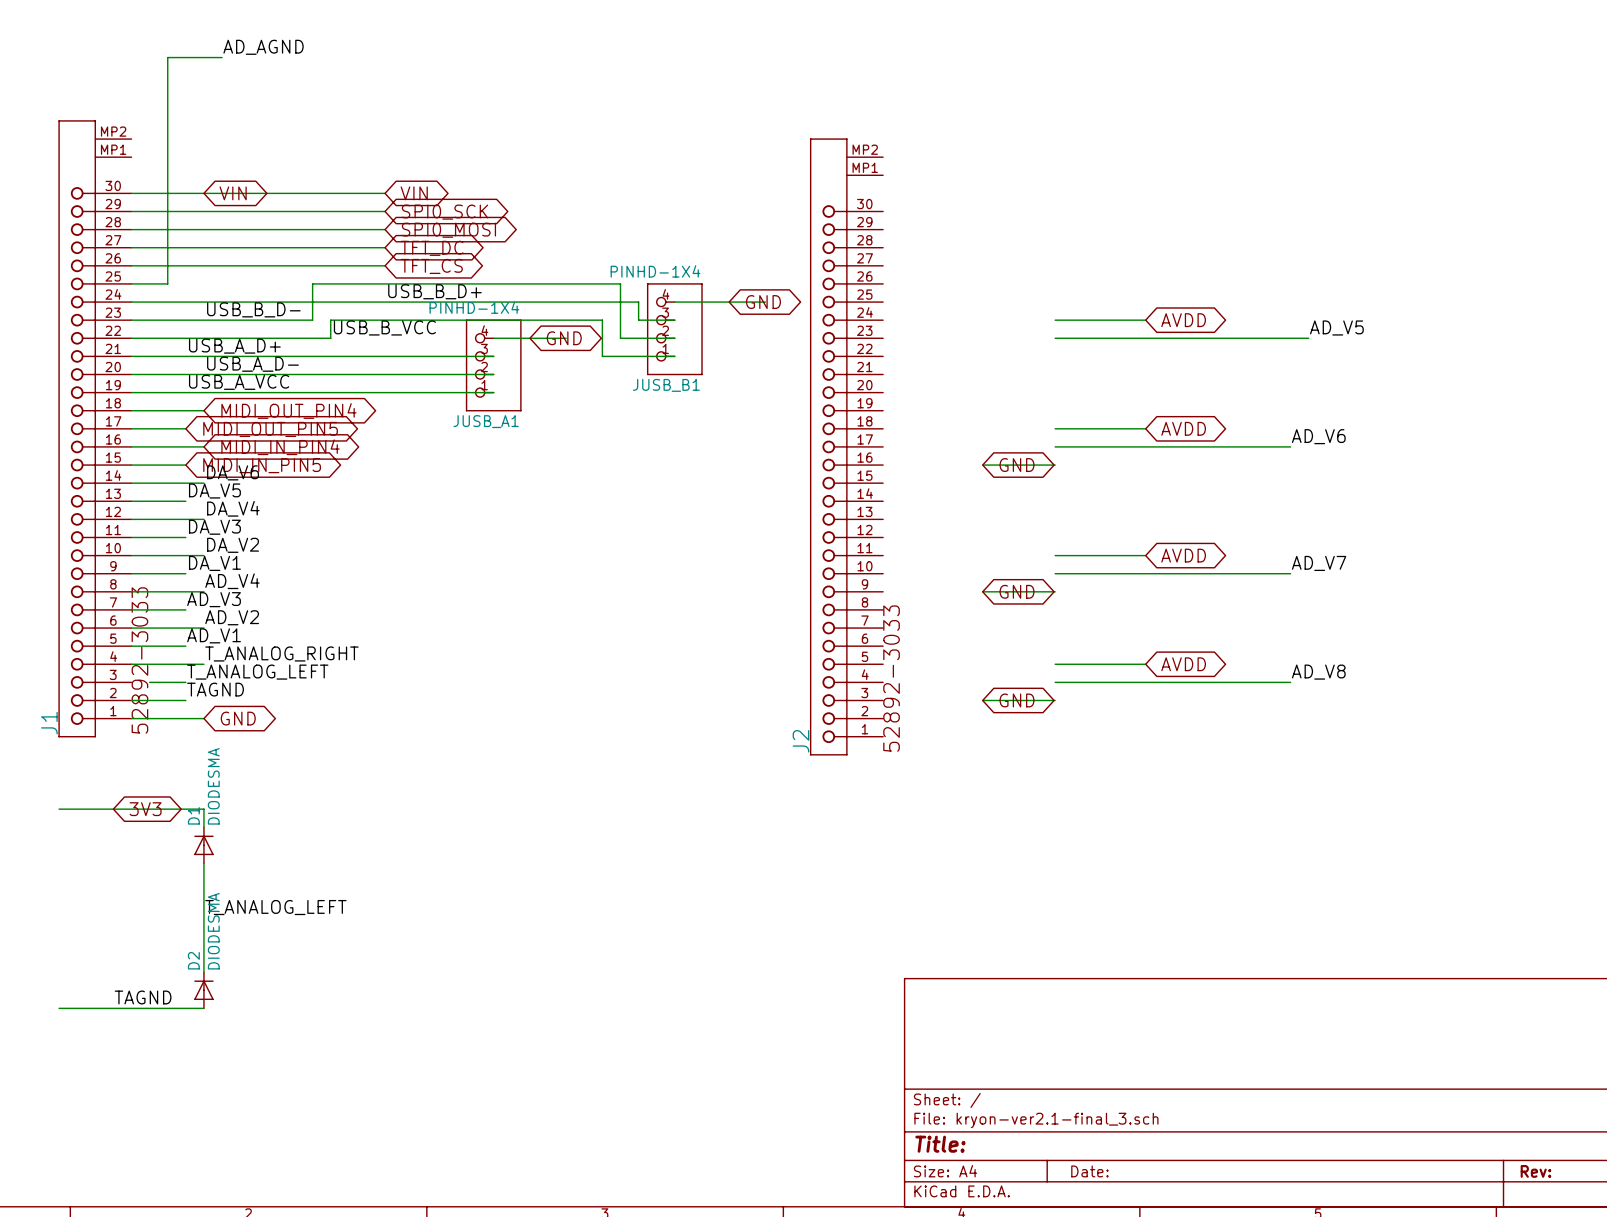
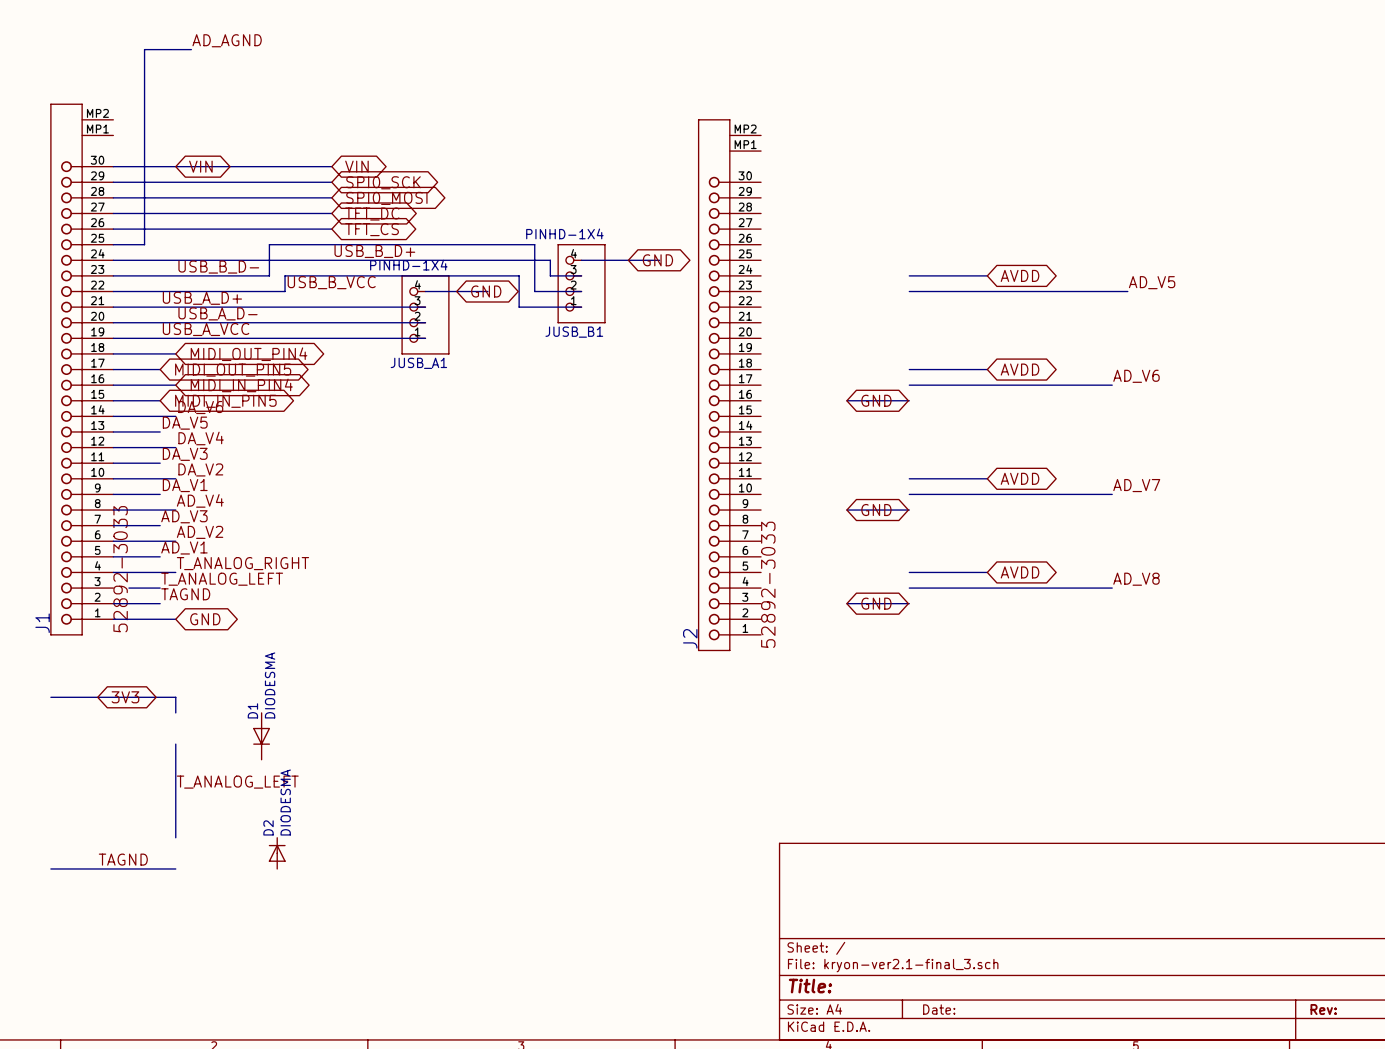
D1 symbol: [194, 827, 214, 864] -> [253, 712, 271, 760]
D2 position: (203, 990) -> (277, 853)

